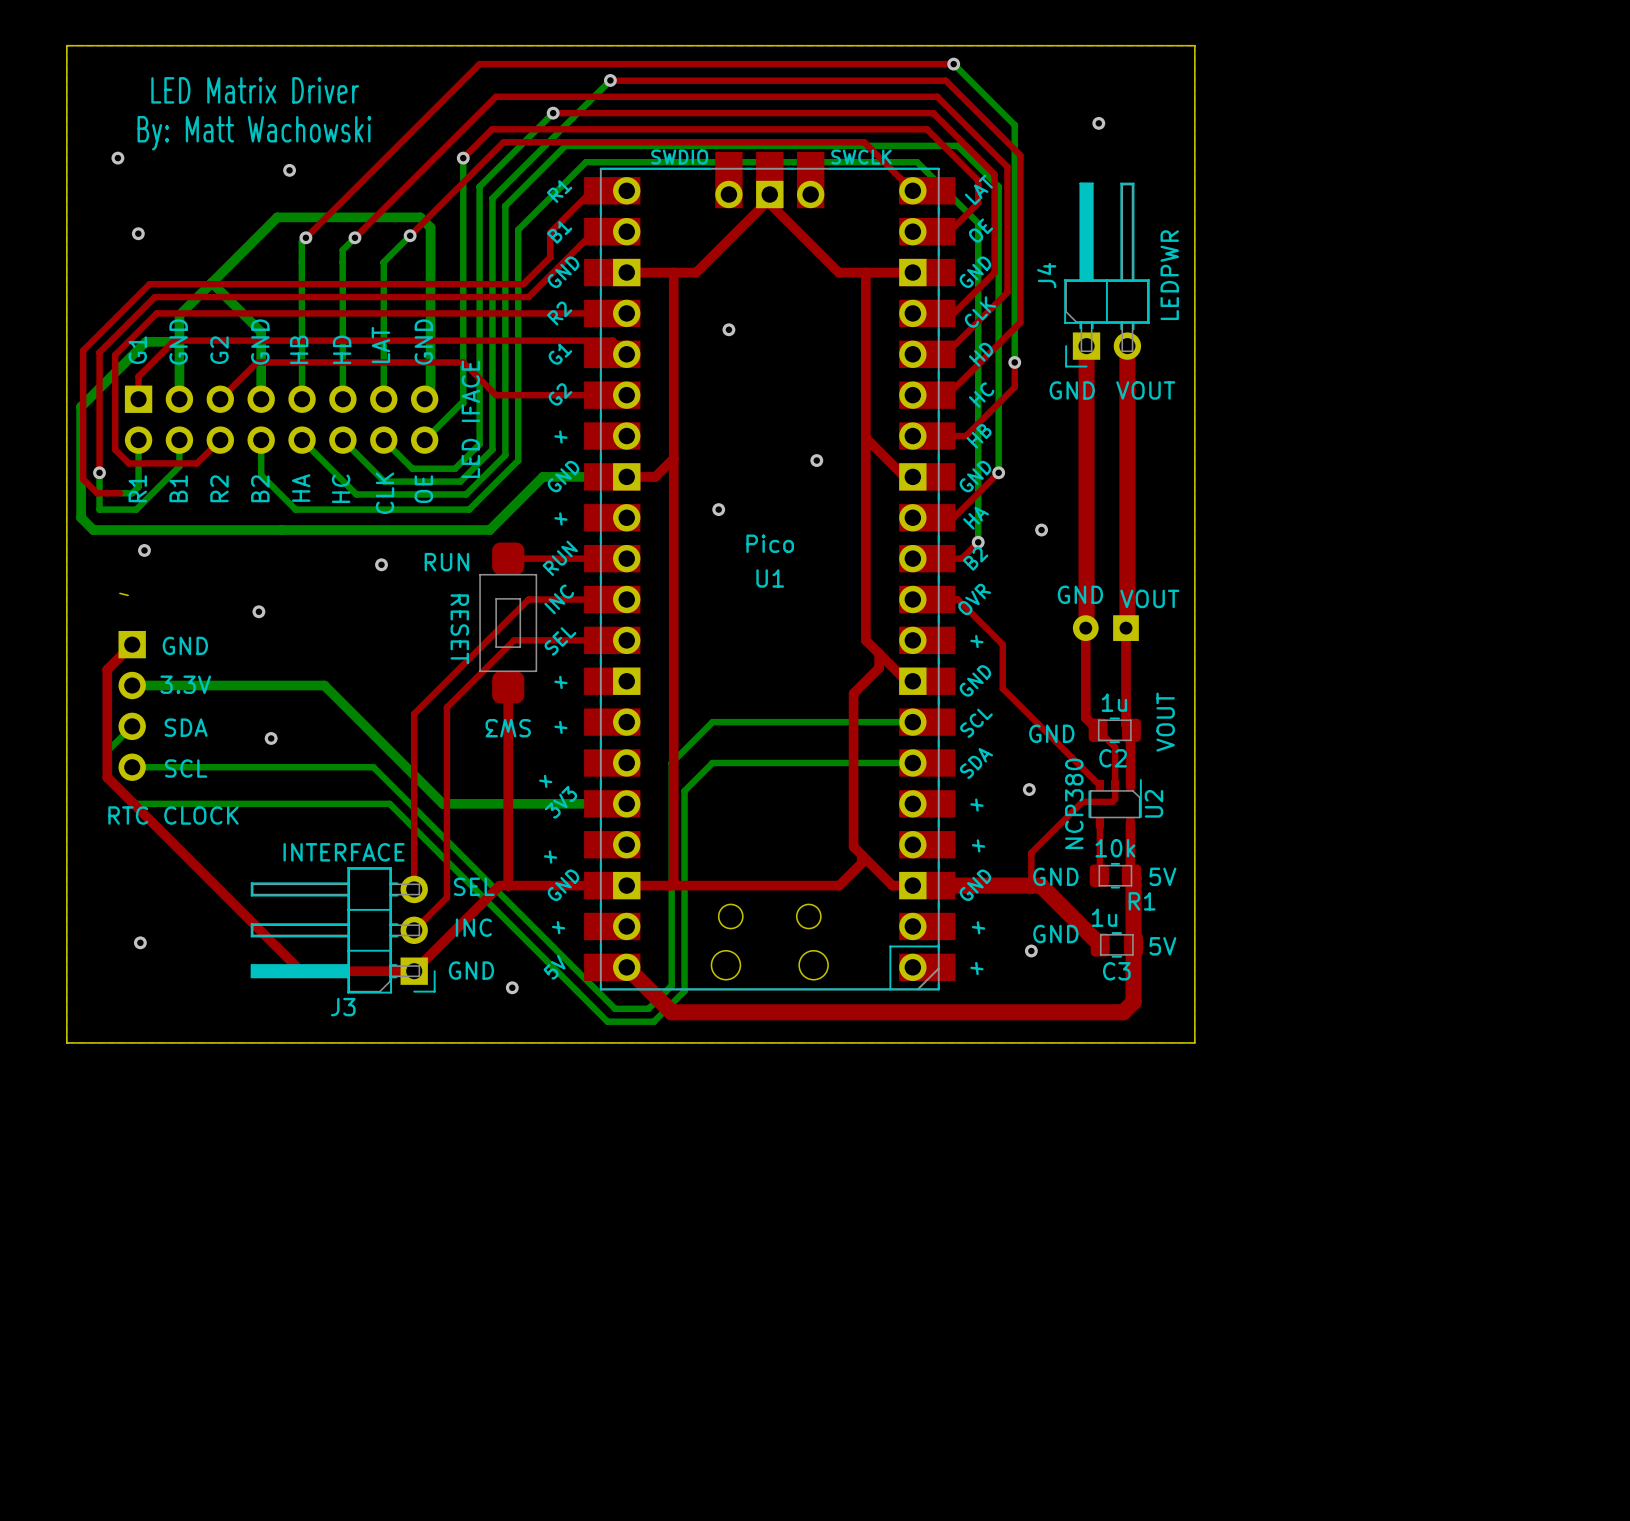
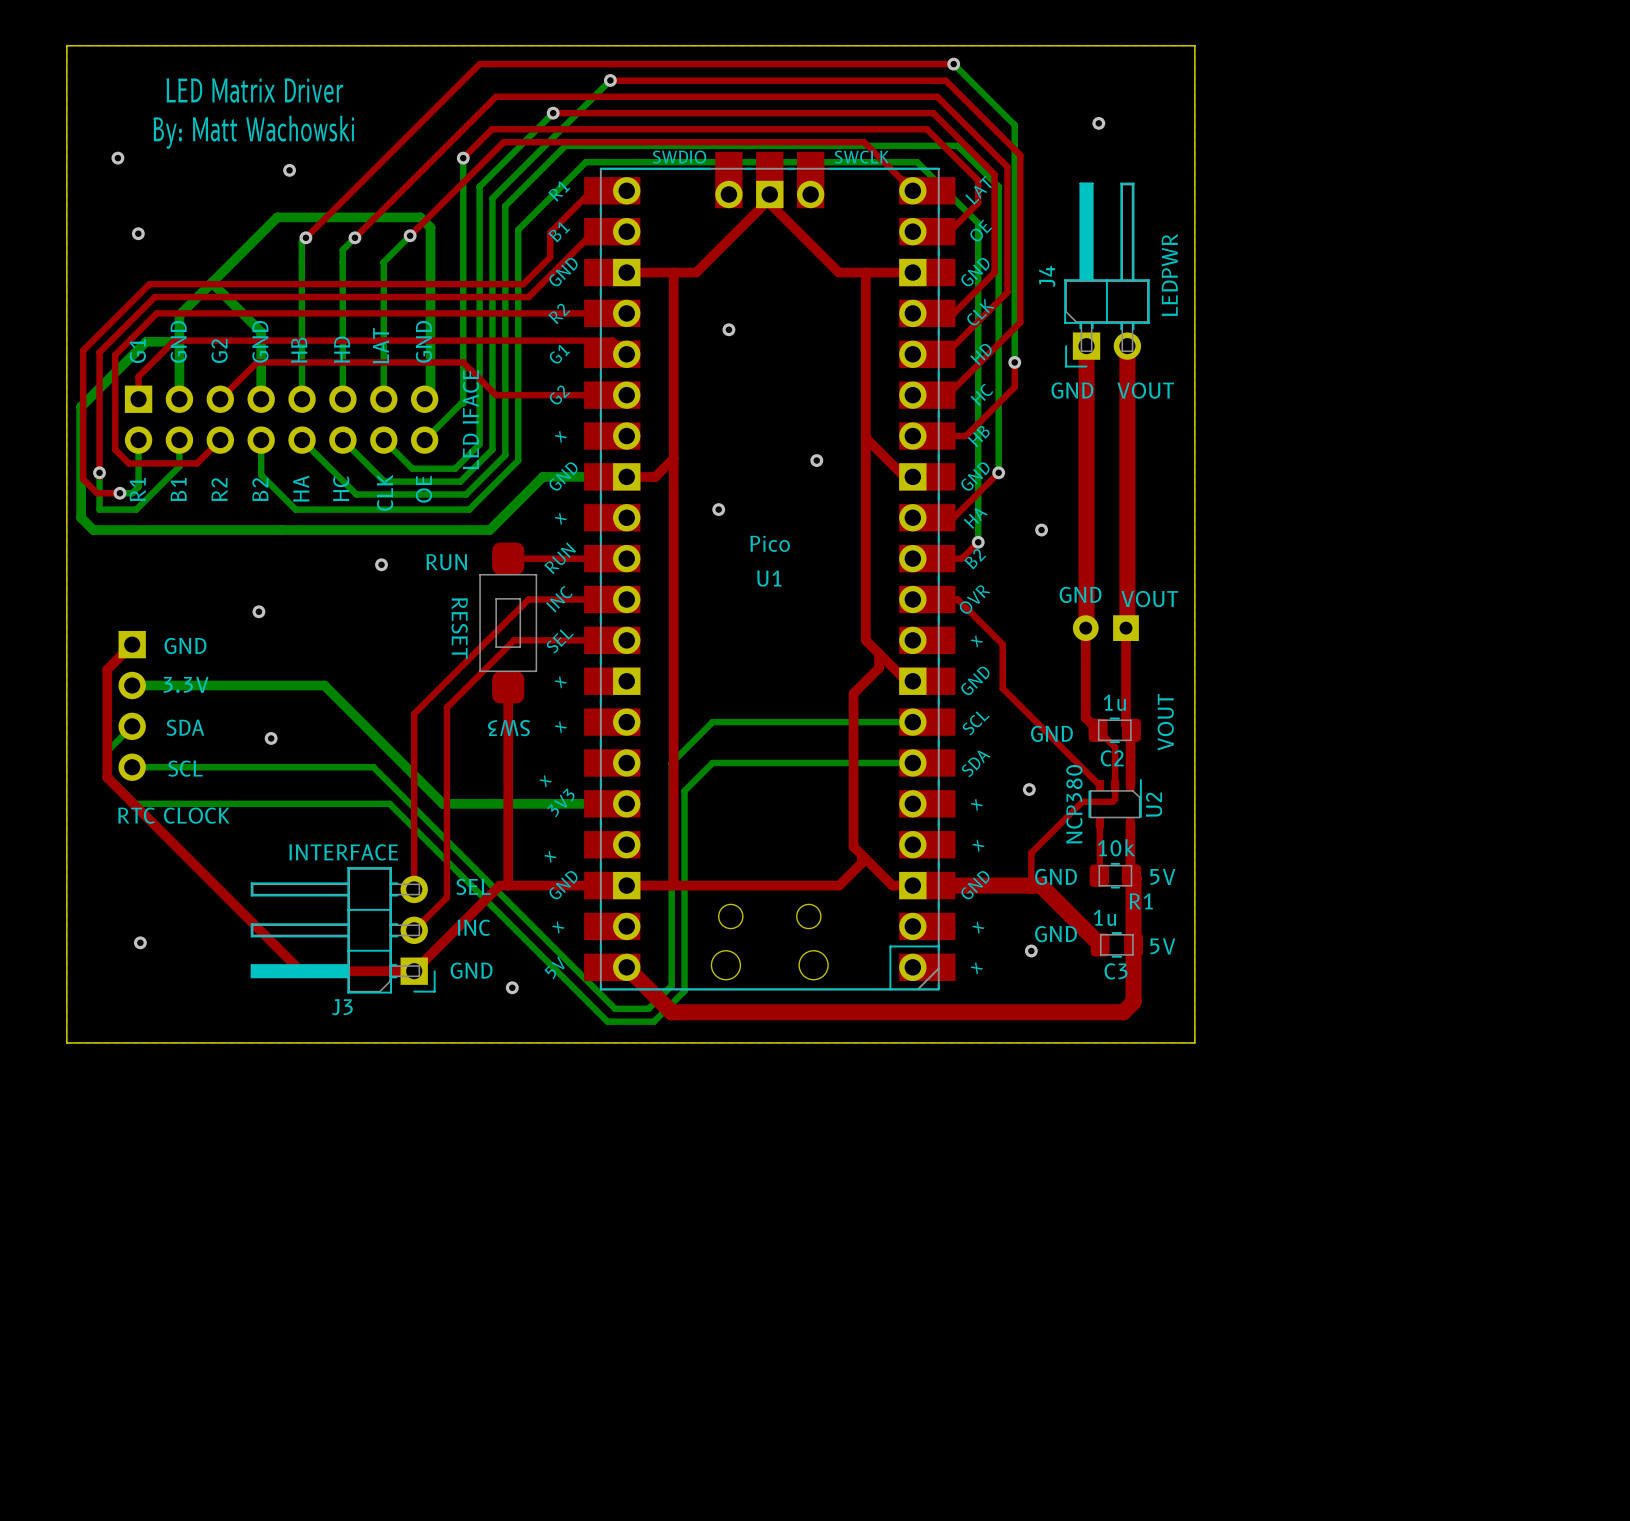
via position: (144, 550) -> (119, 493)
board edge: (119, 593) (128, 595) -> none

